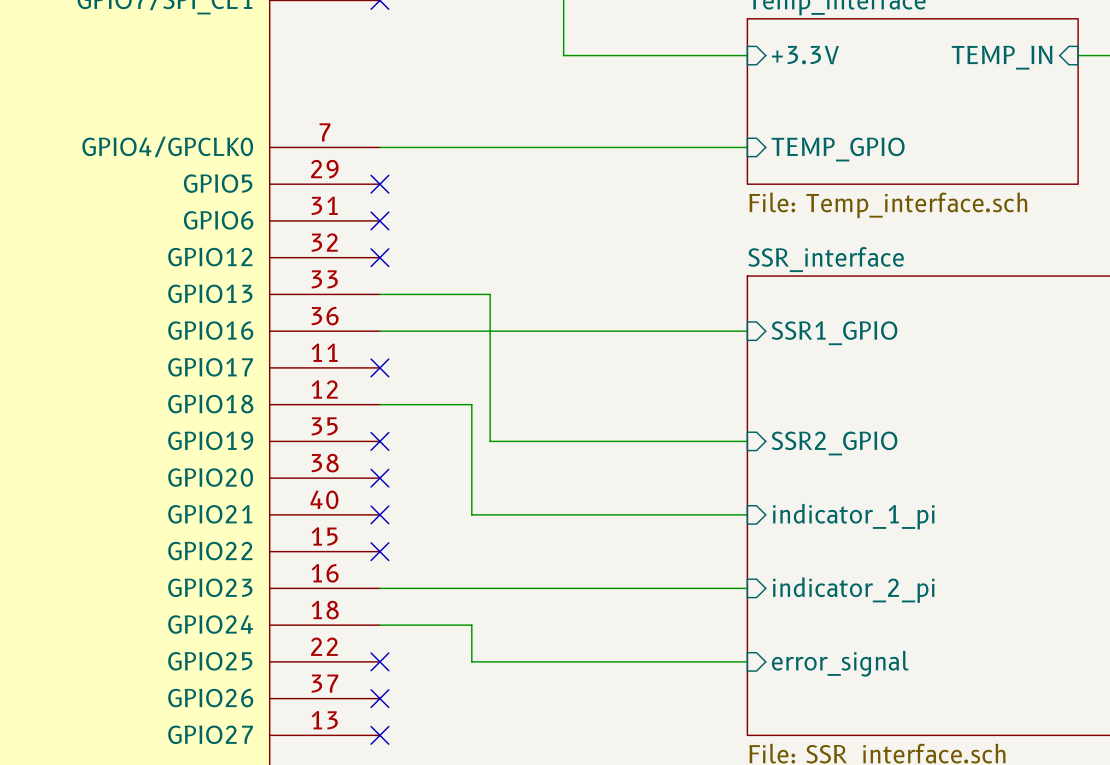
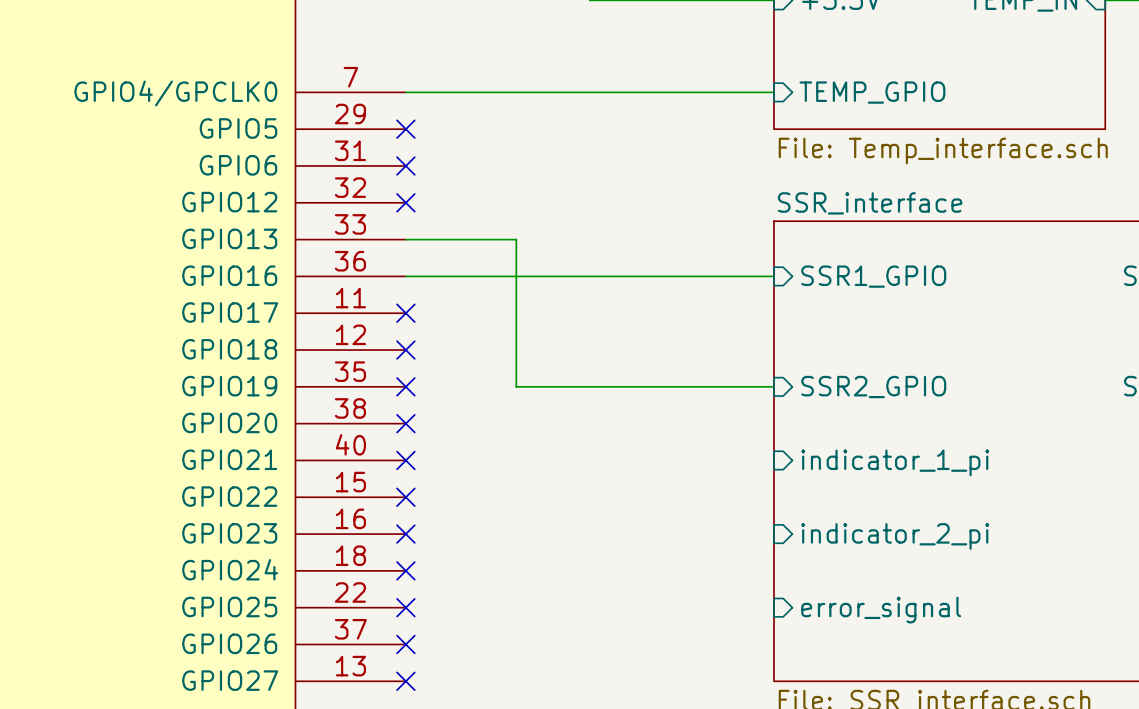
wire: (379, 404) (471, 404) (471, 514) (747, 514) -> none
no-connect mark: none -> (405, 350)
wire: (379, 588) (747, 588) -> none
no-connect mark: none -> (405, 534)
wire: (379, 625) (471, 625) (471, 661) (747, 661) -> none
no-connect mark: none -> (405, 570)

